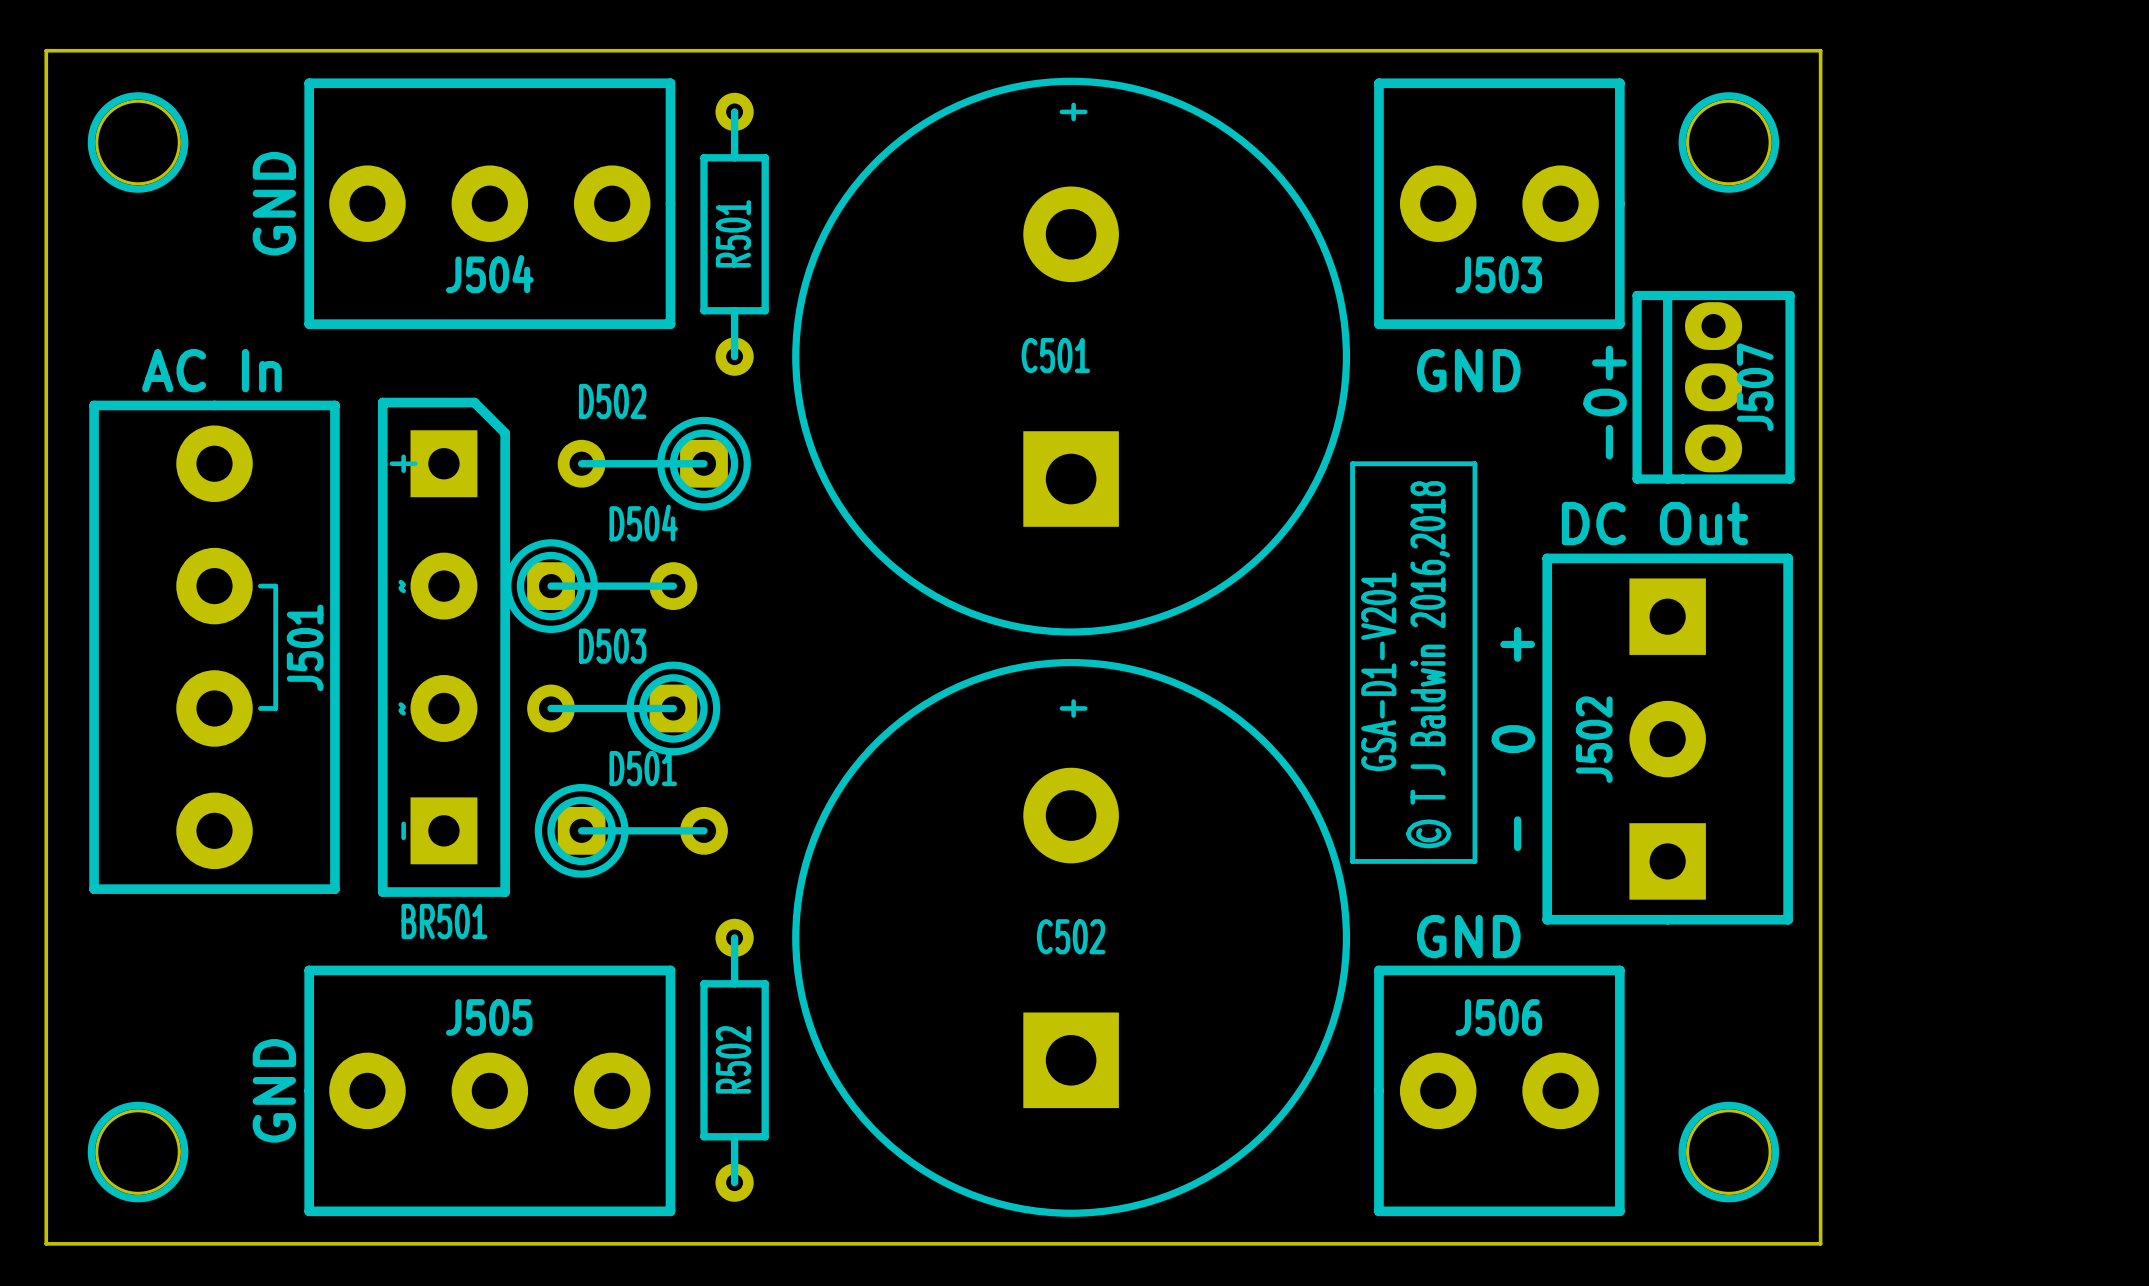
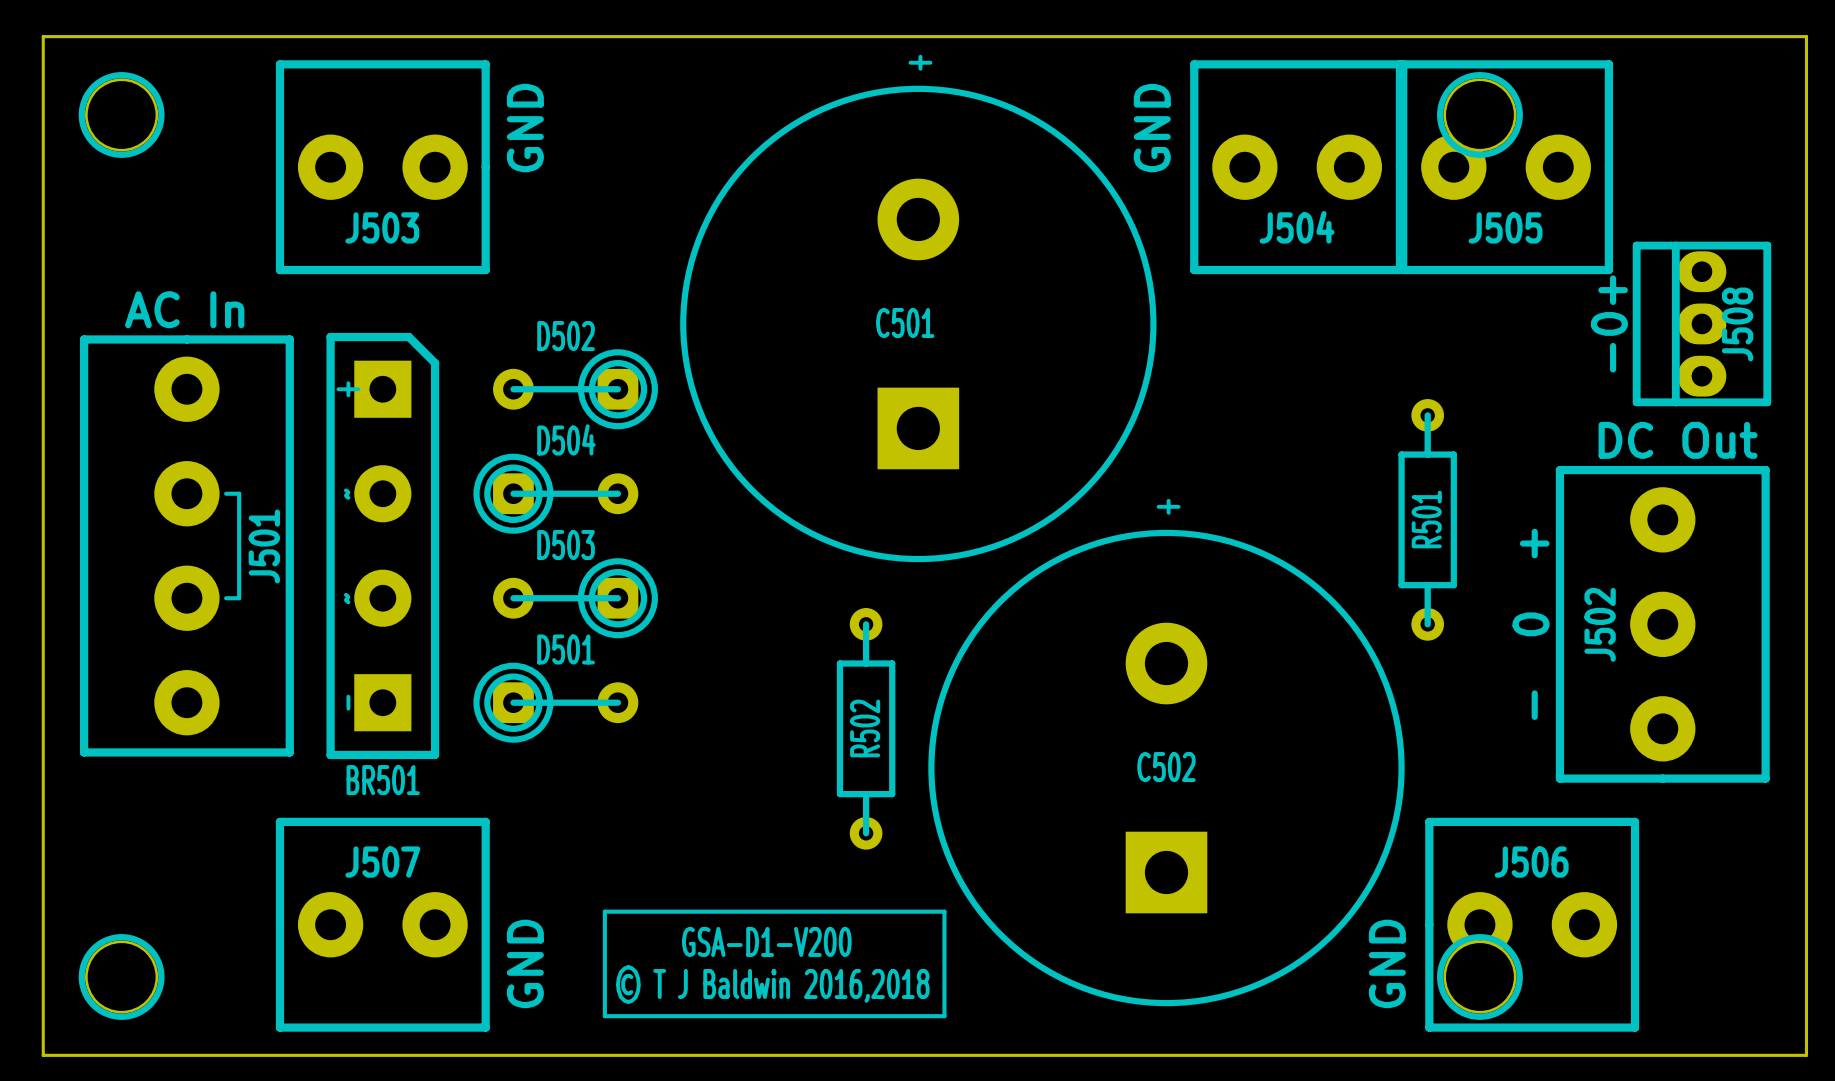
board edge: (1820, 50) (1820, 1243) -> (1558, 36) (1806, 36) (1806, 1055) (1558, 1055)
J504 footprint: [304, 78, 676, 329] -> [1190, 60, 1405, 275]
C501 text position: + (1073, 111) -> + (920, 62)
text position: GND (274, 203) -> GND (525, 128)
J503 position: (1499, 203) -> (382, 167)
R501 position: (734, 234) -> (1427, 519)
J507 footprint: [1632, 290, 1795, 484] -> [275, 817, 490, 1032]
C501 position: (1071, 356) -> (918, 323)
text rotation: 0° (1468, 370) -> 90° counterclockwise (1152, 128)
text position: GND (1468, 370) -> GND (1152, 128)
J507 name position: J507 (1755, 387) -> J507 (382, 862)
J508: none -> (1701, 323)
text position: -0+ (1605, 402) -> -0+ (1609, 323)
D504 position: (654, 463) -> (575, 389)
line: (1352, 463) (1474, 463) (1474, 861) (1352, 861) (1352, 463) -> none
text position: DC Out (1654, 523) -> DC Out (1678, 440)
J502 footprint: [1542, 553, 1793, 925] -> [1555, 465, 1770, 783]
D502 position: (600, 586) -> (555, 493)
text: © T J Baldwin 2016,2018 (1428, 664) -> none
text: GSA-D1-V201 (1378, 671) -> none
D503 position: (623, 708) -> (575, 598)
C502 text position: + (1073, 708) -> + (1168, 506)
text position: - 0 + (1513, 739) -> - 0 + (1531, 624)
D501 position: (631, 830) -> (555, 702)
text rotation: 0° (1468, 936) -> 90° counterclockwise (1387, 963)
text position: GND (1468, 936) -> GND (1387, 963)
C502 position: (1071, 937) -> (1166, 768)
J505 footprint: [304, 965, 676, 1217] -> [1399, 60, 1614, 275]
J505 name position: J505 (489, 1017) -> J505 (1505, 227)
R502 position: (734, 1060) -> (866, 728)
line: none -> (604, 911) (944, 911) (944, 1016) (604, 1016) (604, 911)
text position: GND (274, 1090) -> GND (525, 963)
J506 position: (1499, 1090) -> (1532, 924)
text: none -> GSA-D1-V200 (766, 941)
text: none -> © T J Baldwin 2016,2018 (772, 984)

